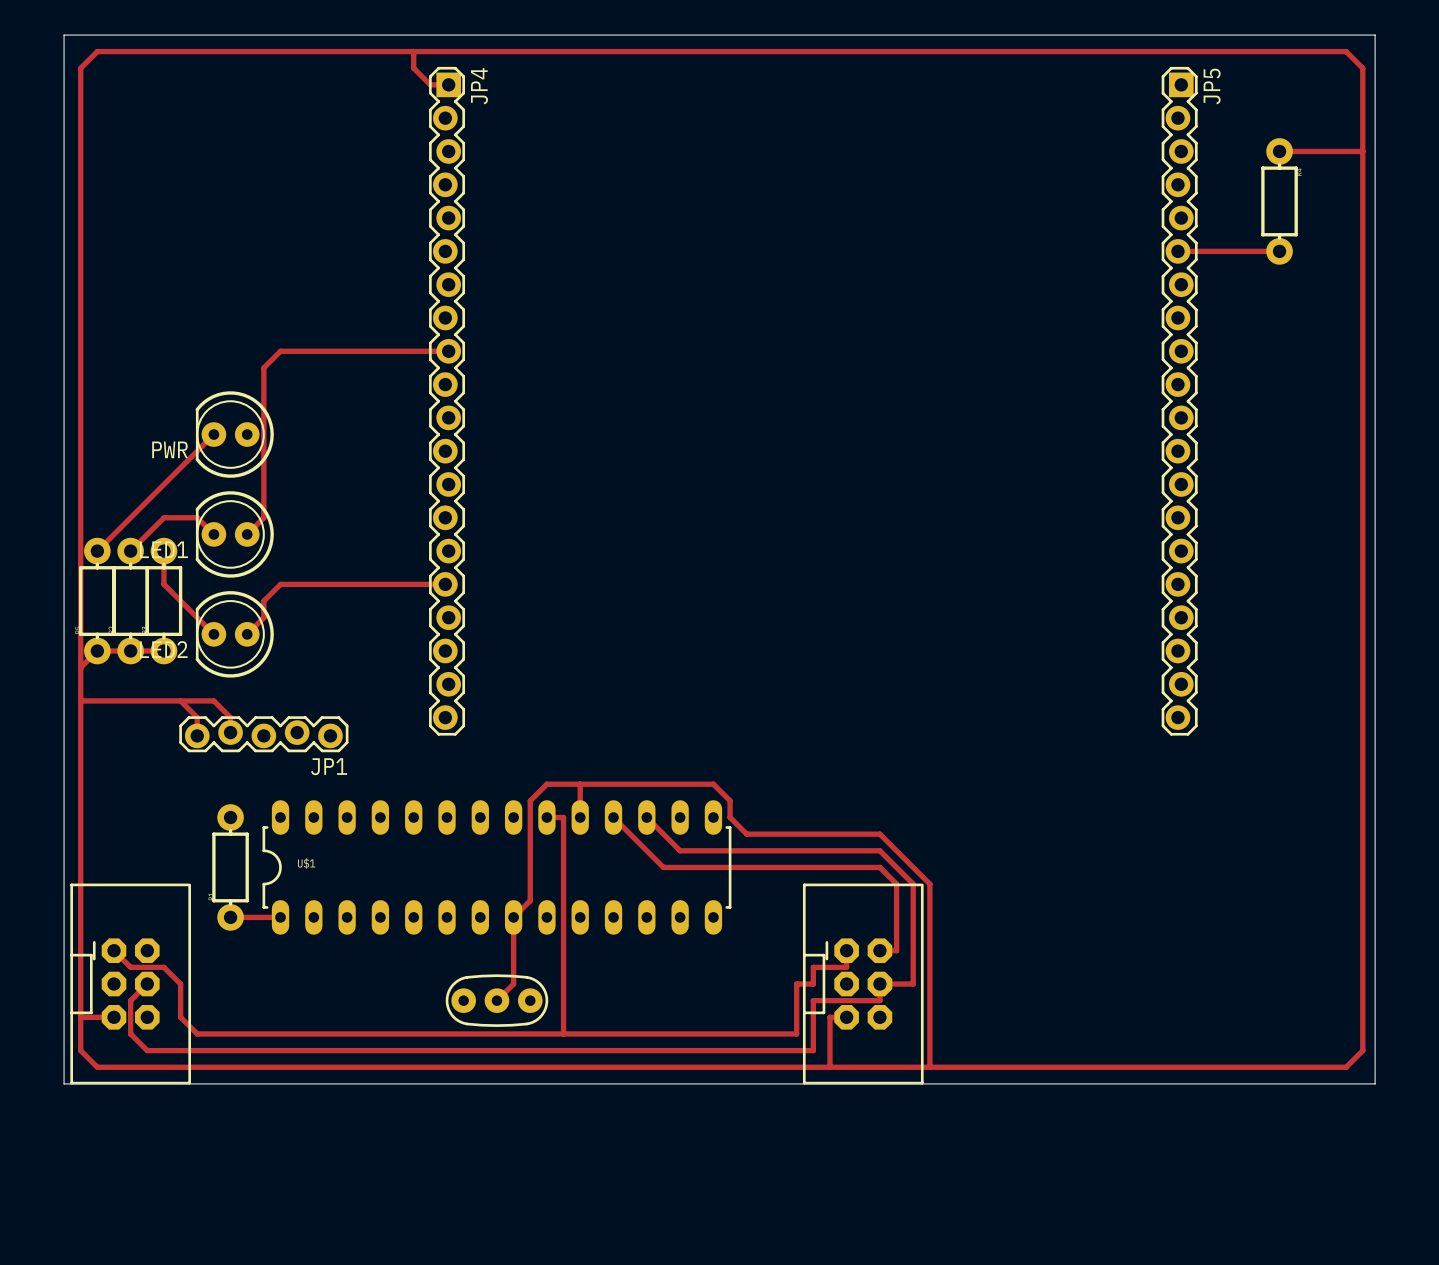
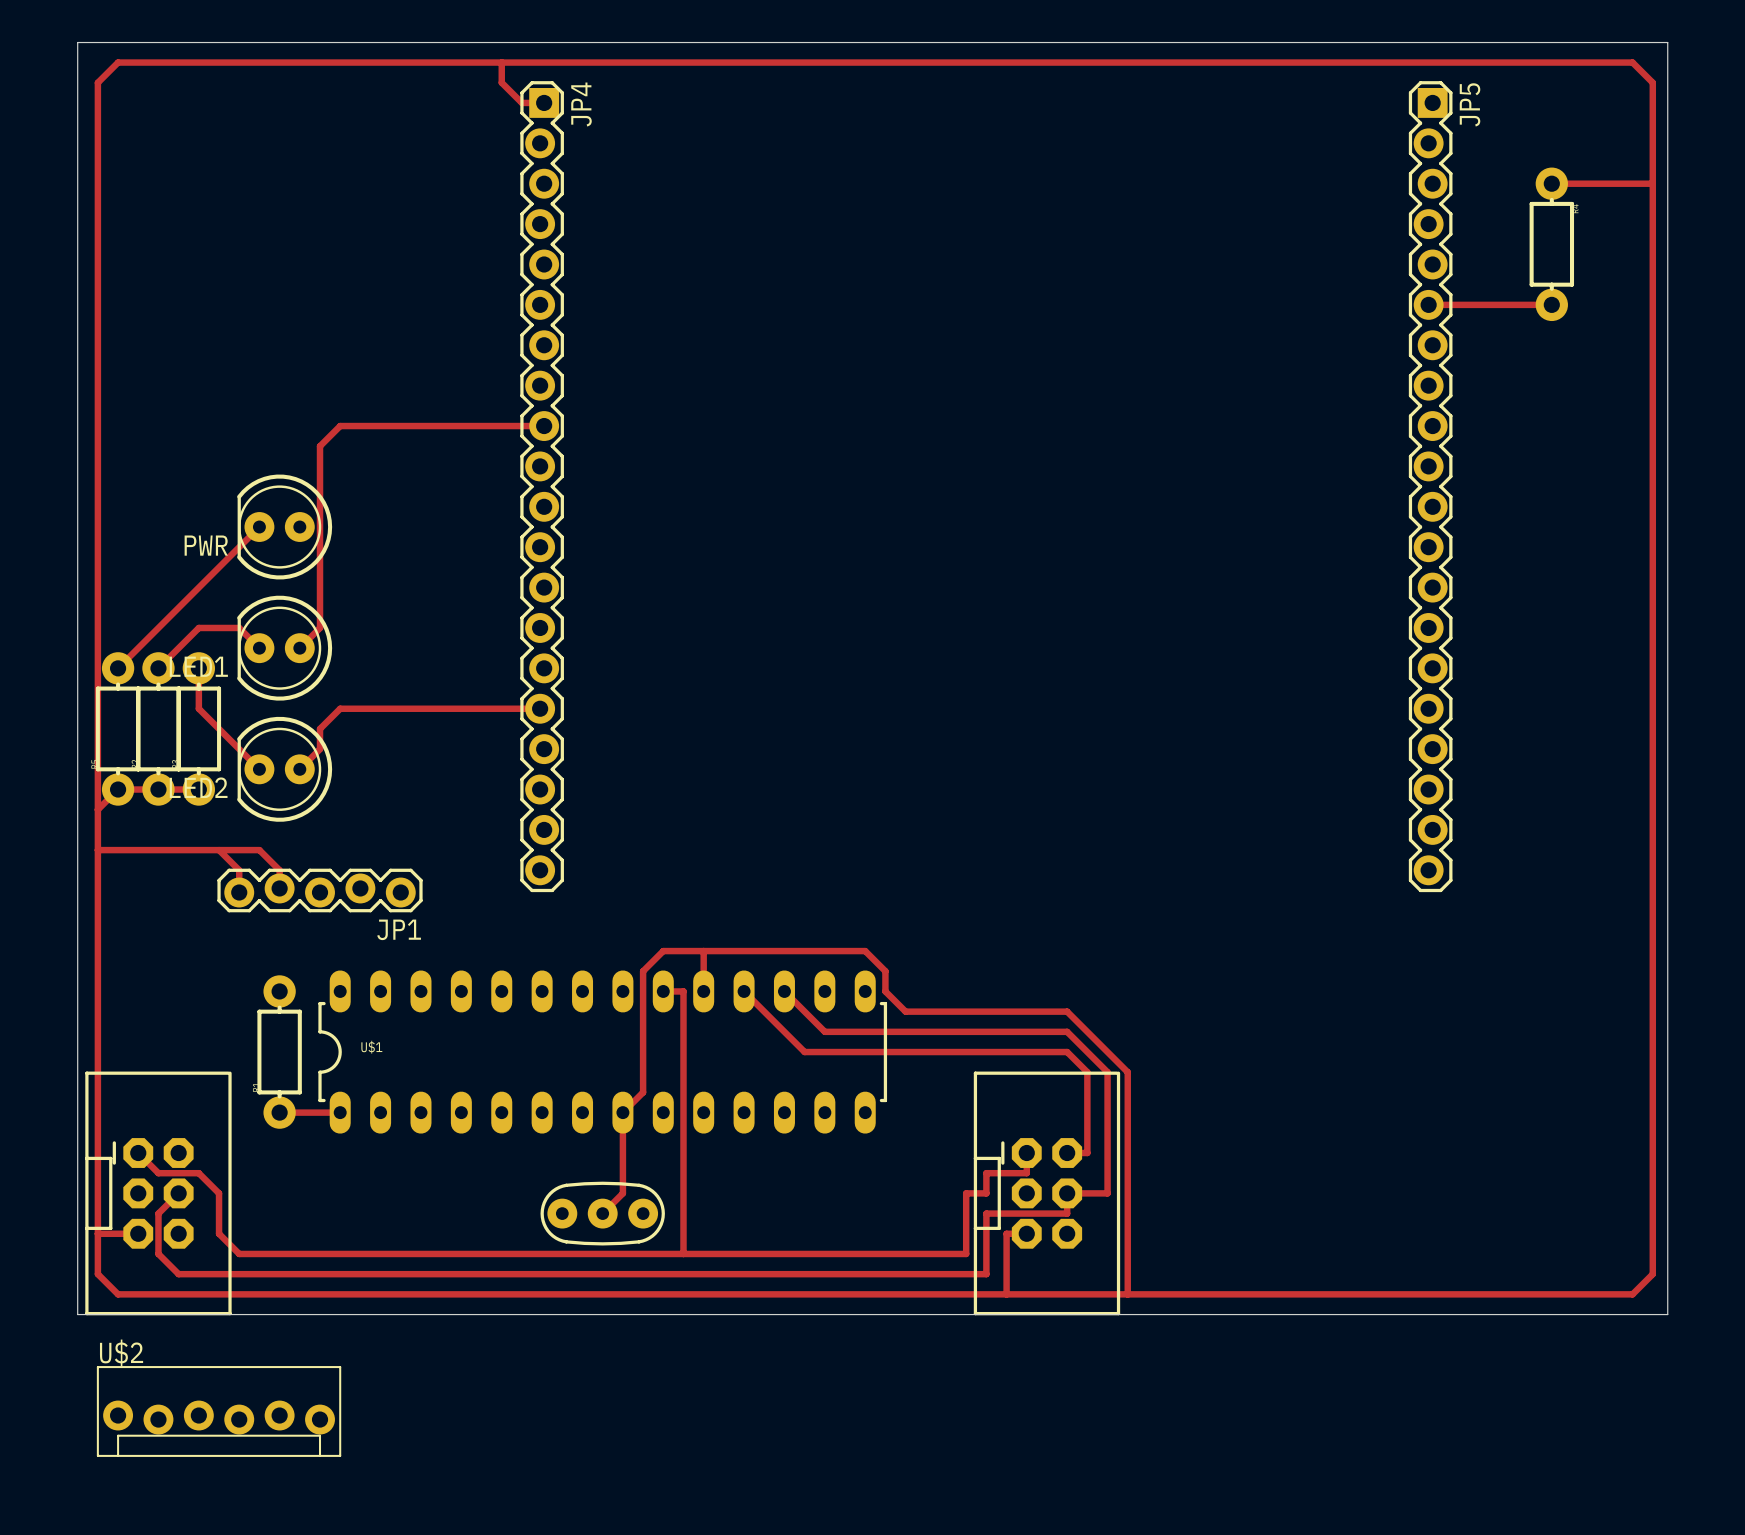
U$2: none -> (219, 1411)

